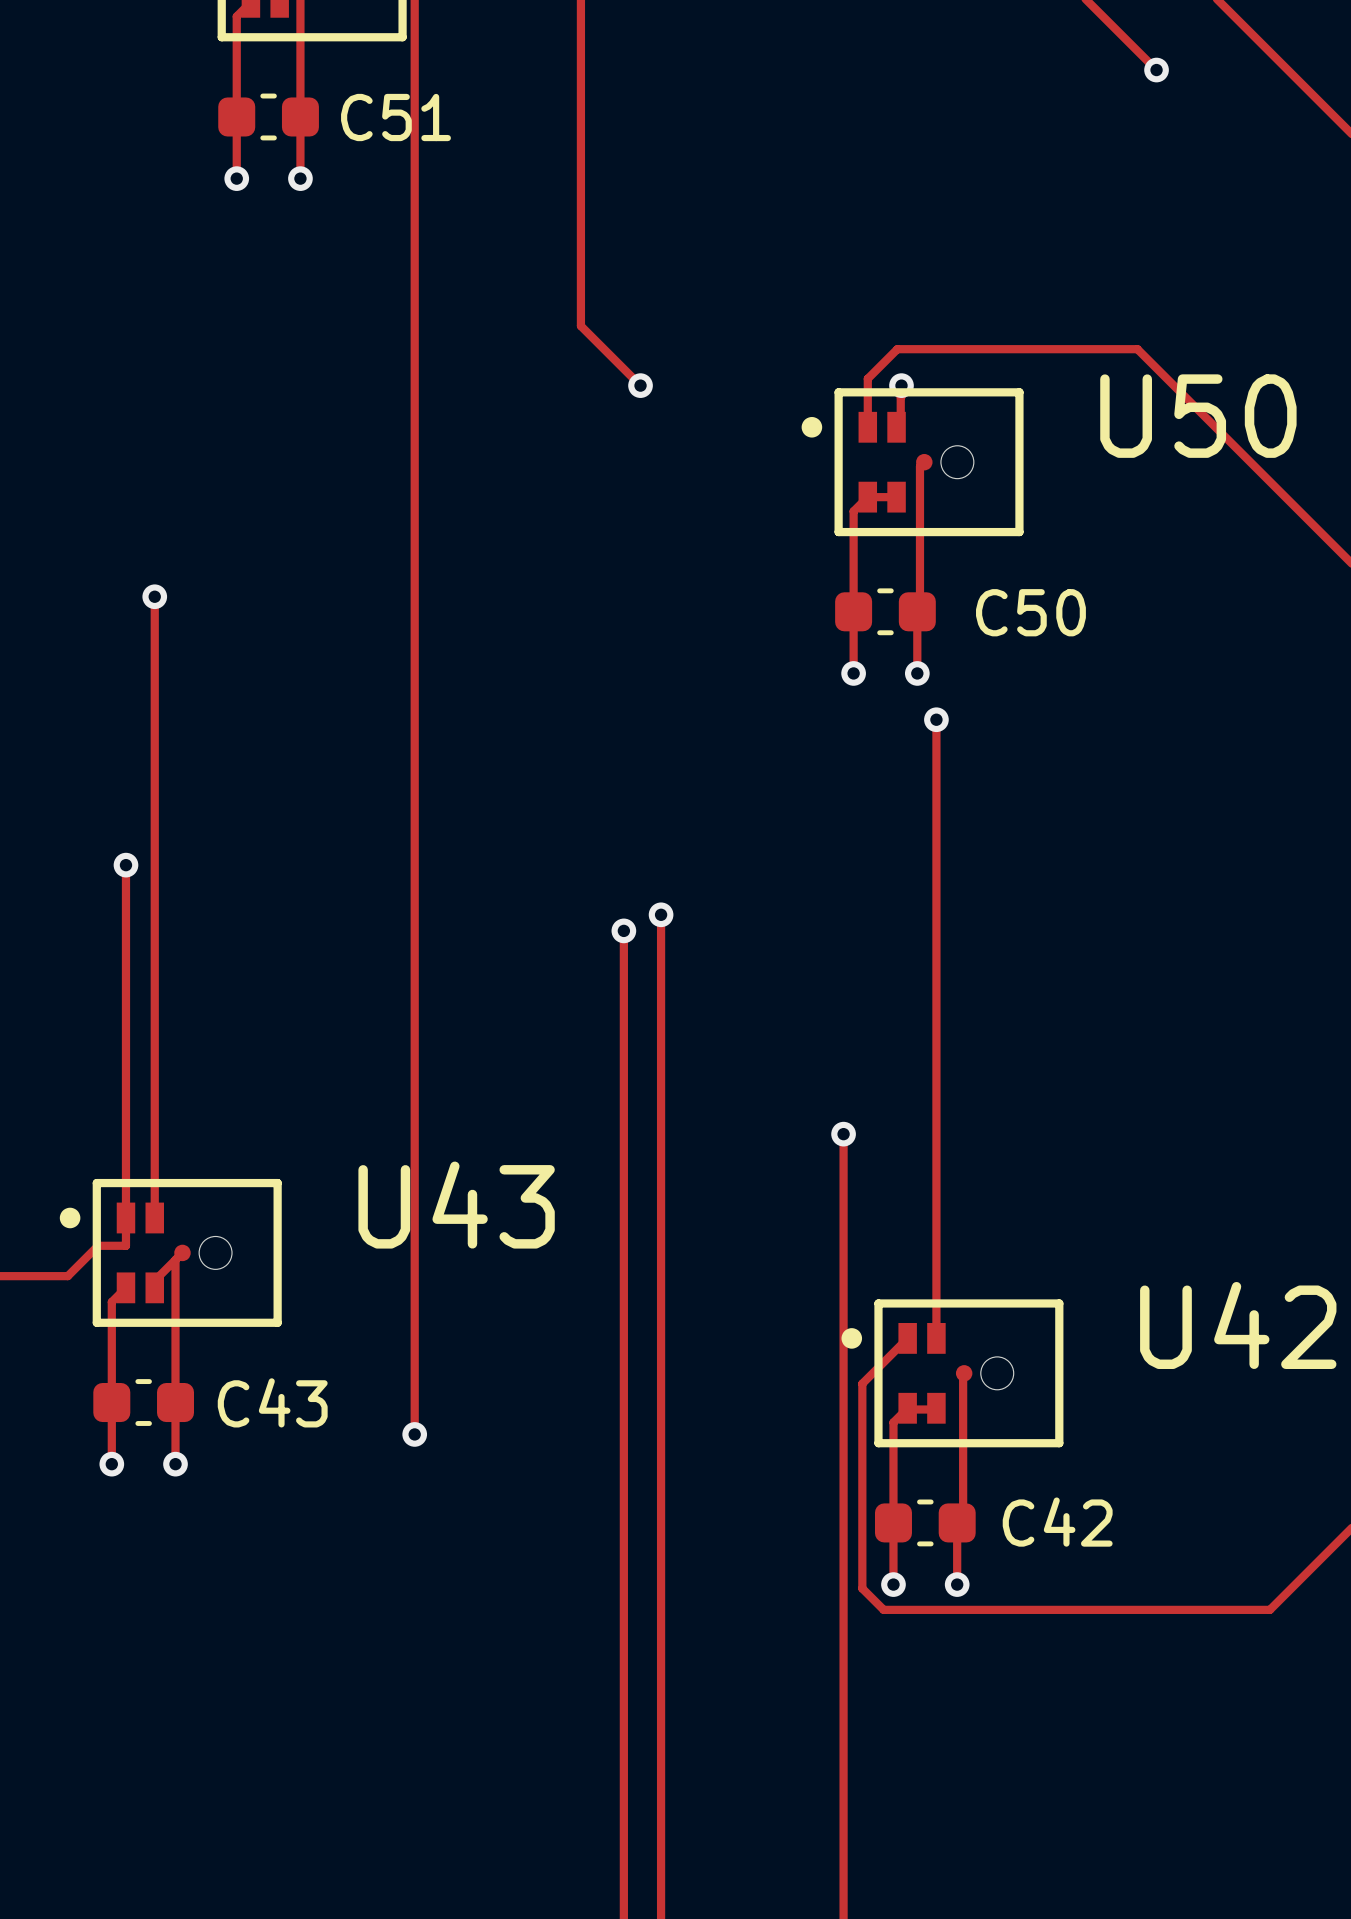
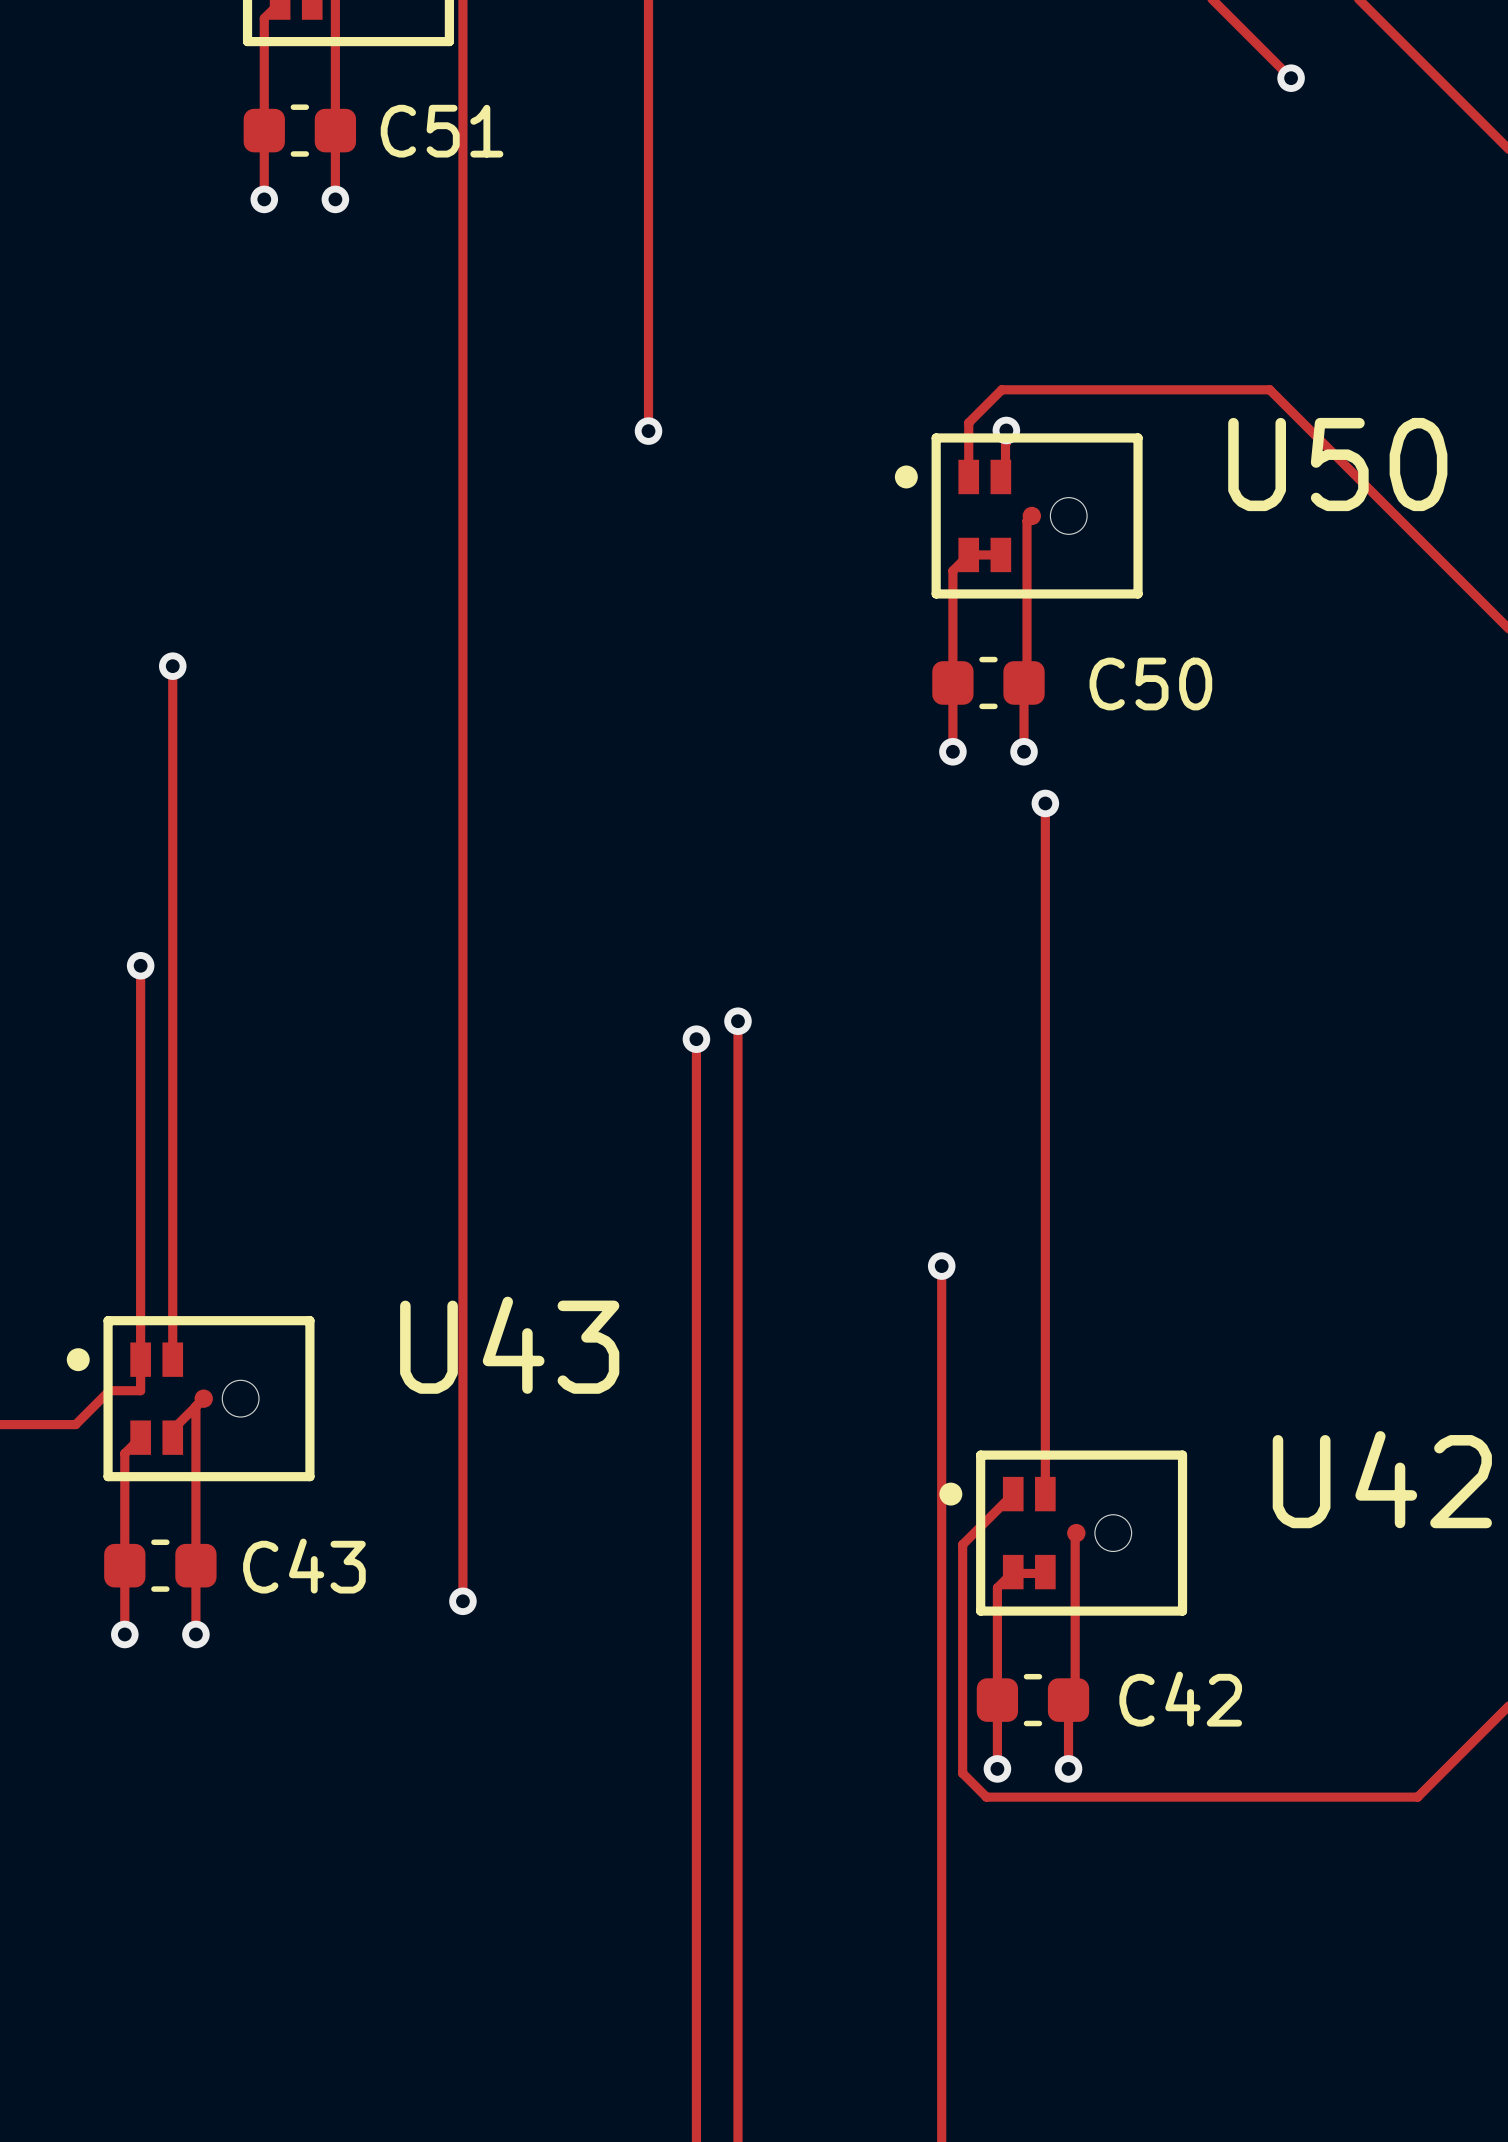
track: (580, 326) (640, 385) -> (648, 363) (648, 431)
via position: (640, 385) -> (648, 431)

